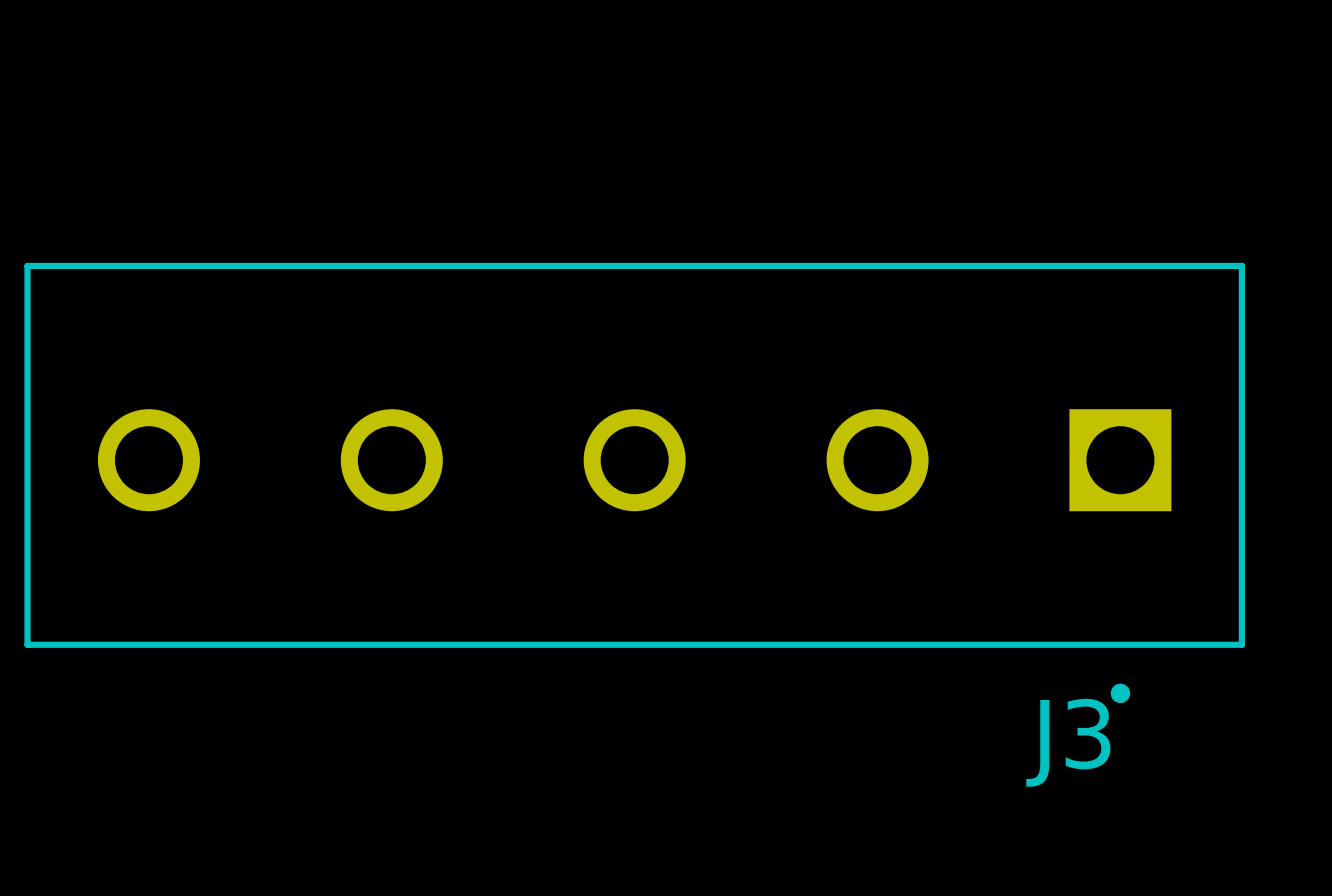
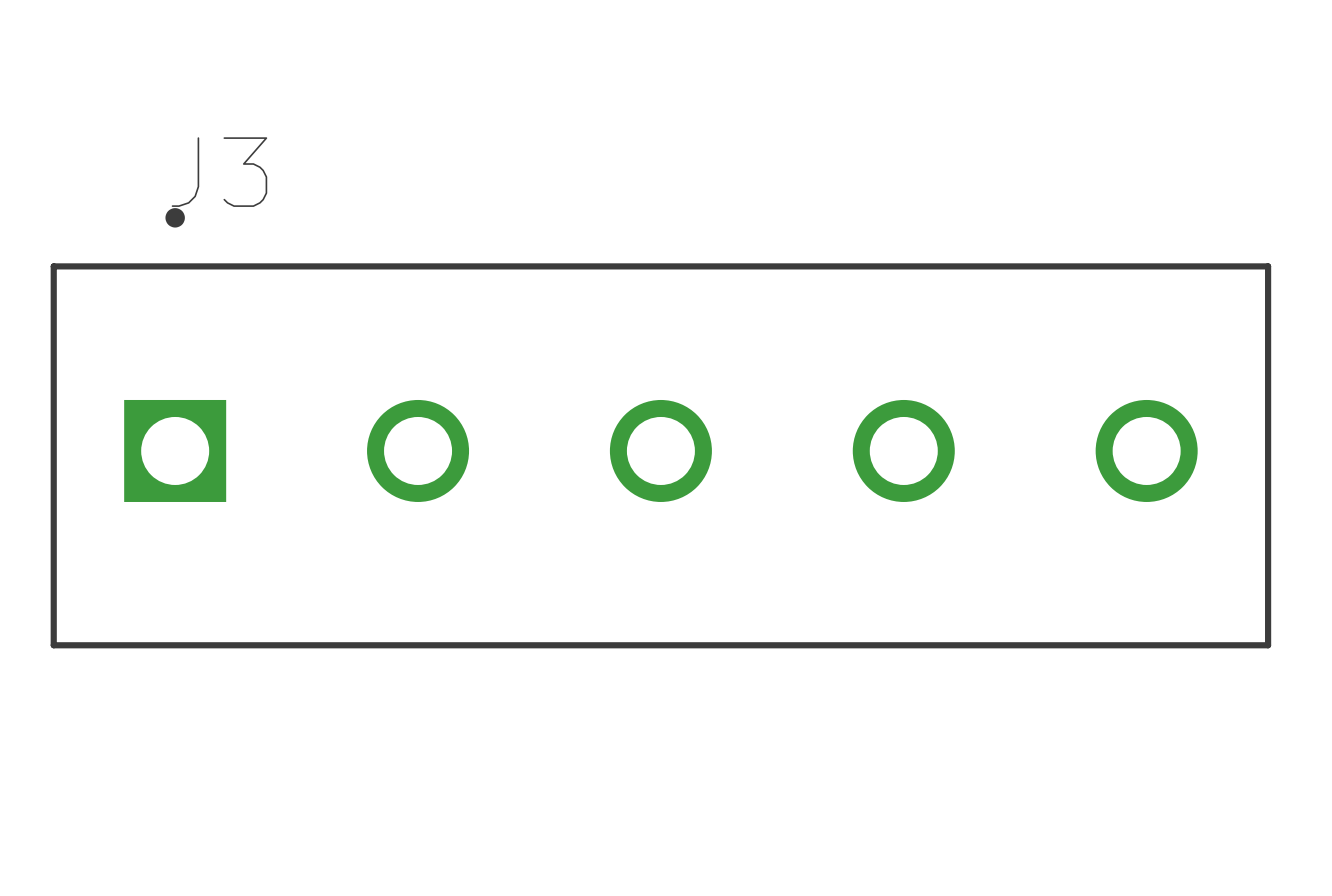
J3 rotation: 0° (634, 482) -> 180° (660, 428)

